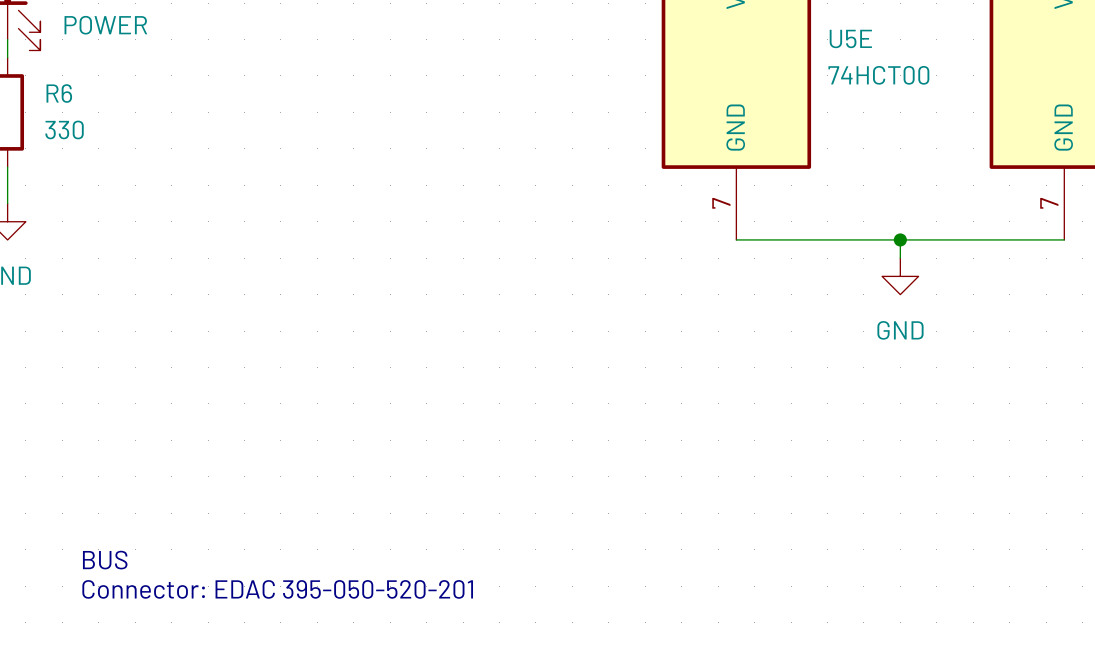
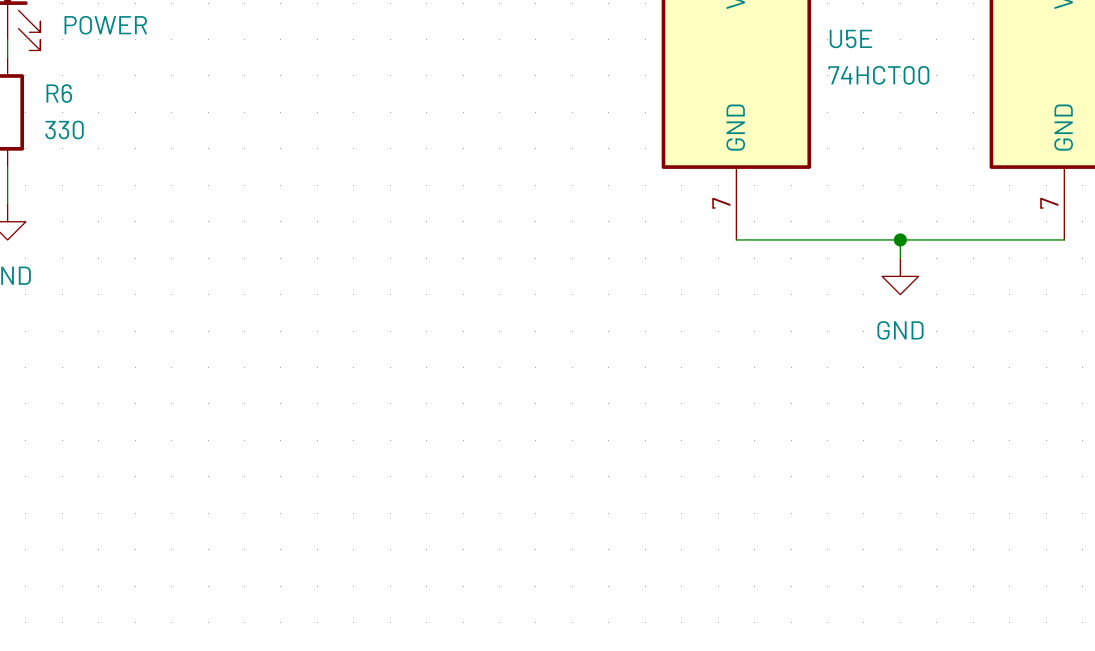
text: BUS (105, 560) -> none
text: Connector: EDAC 395-050-520-201 (277, 589) -> none

